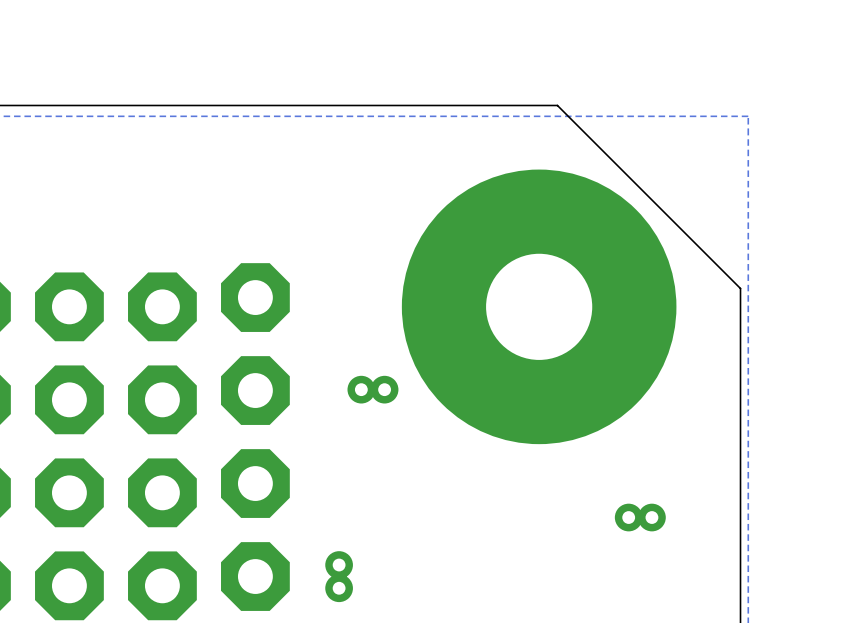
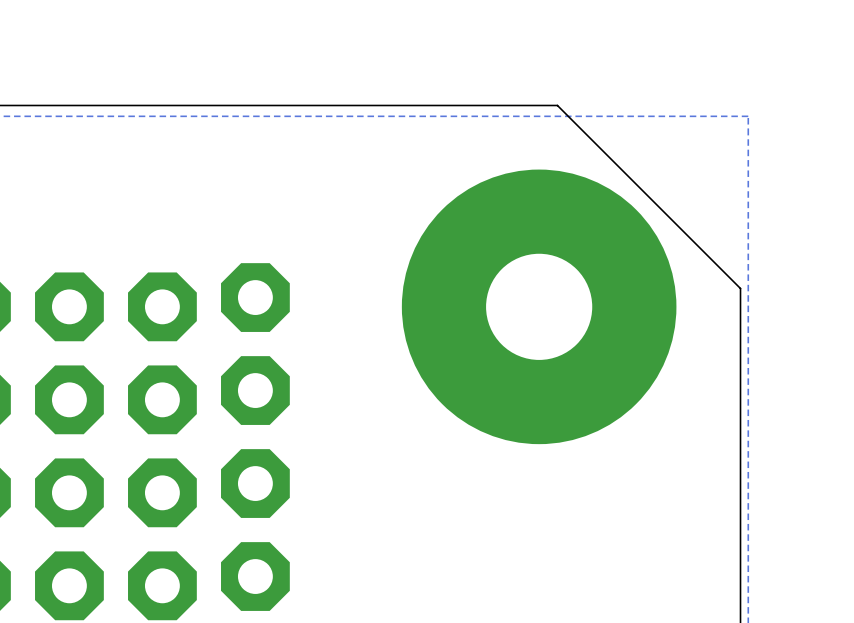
via: (361, 389) -> none
via: (384, 389) -> none
via: (628, 517) -> none
via: (651, 517) -> none
via: (339, 565) -> none
via: (339, 588) -> none

